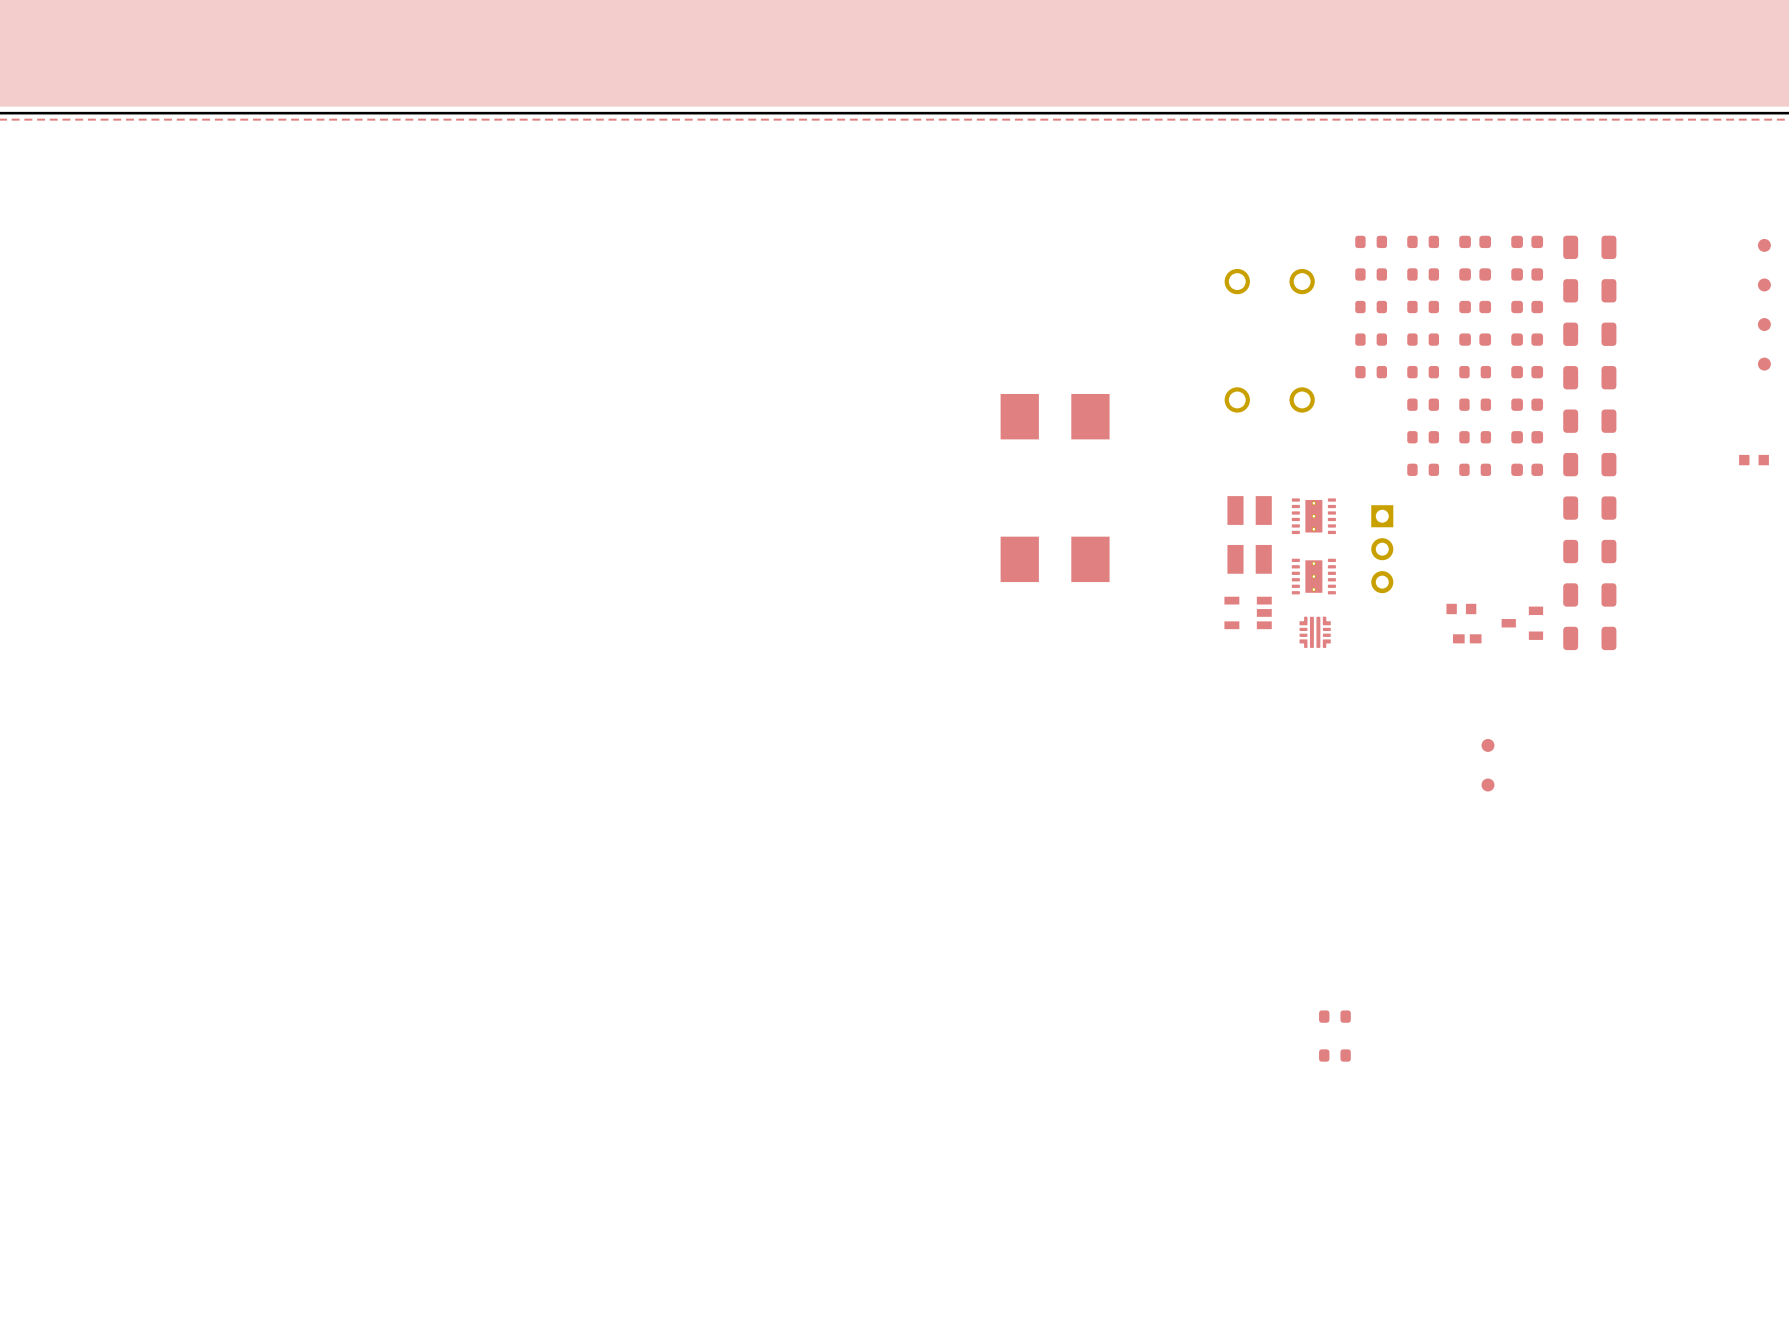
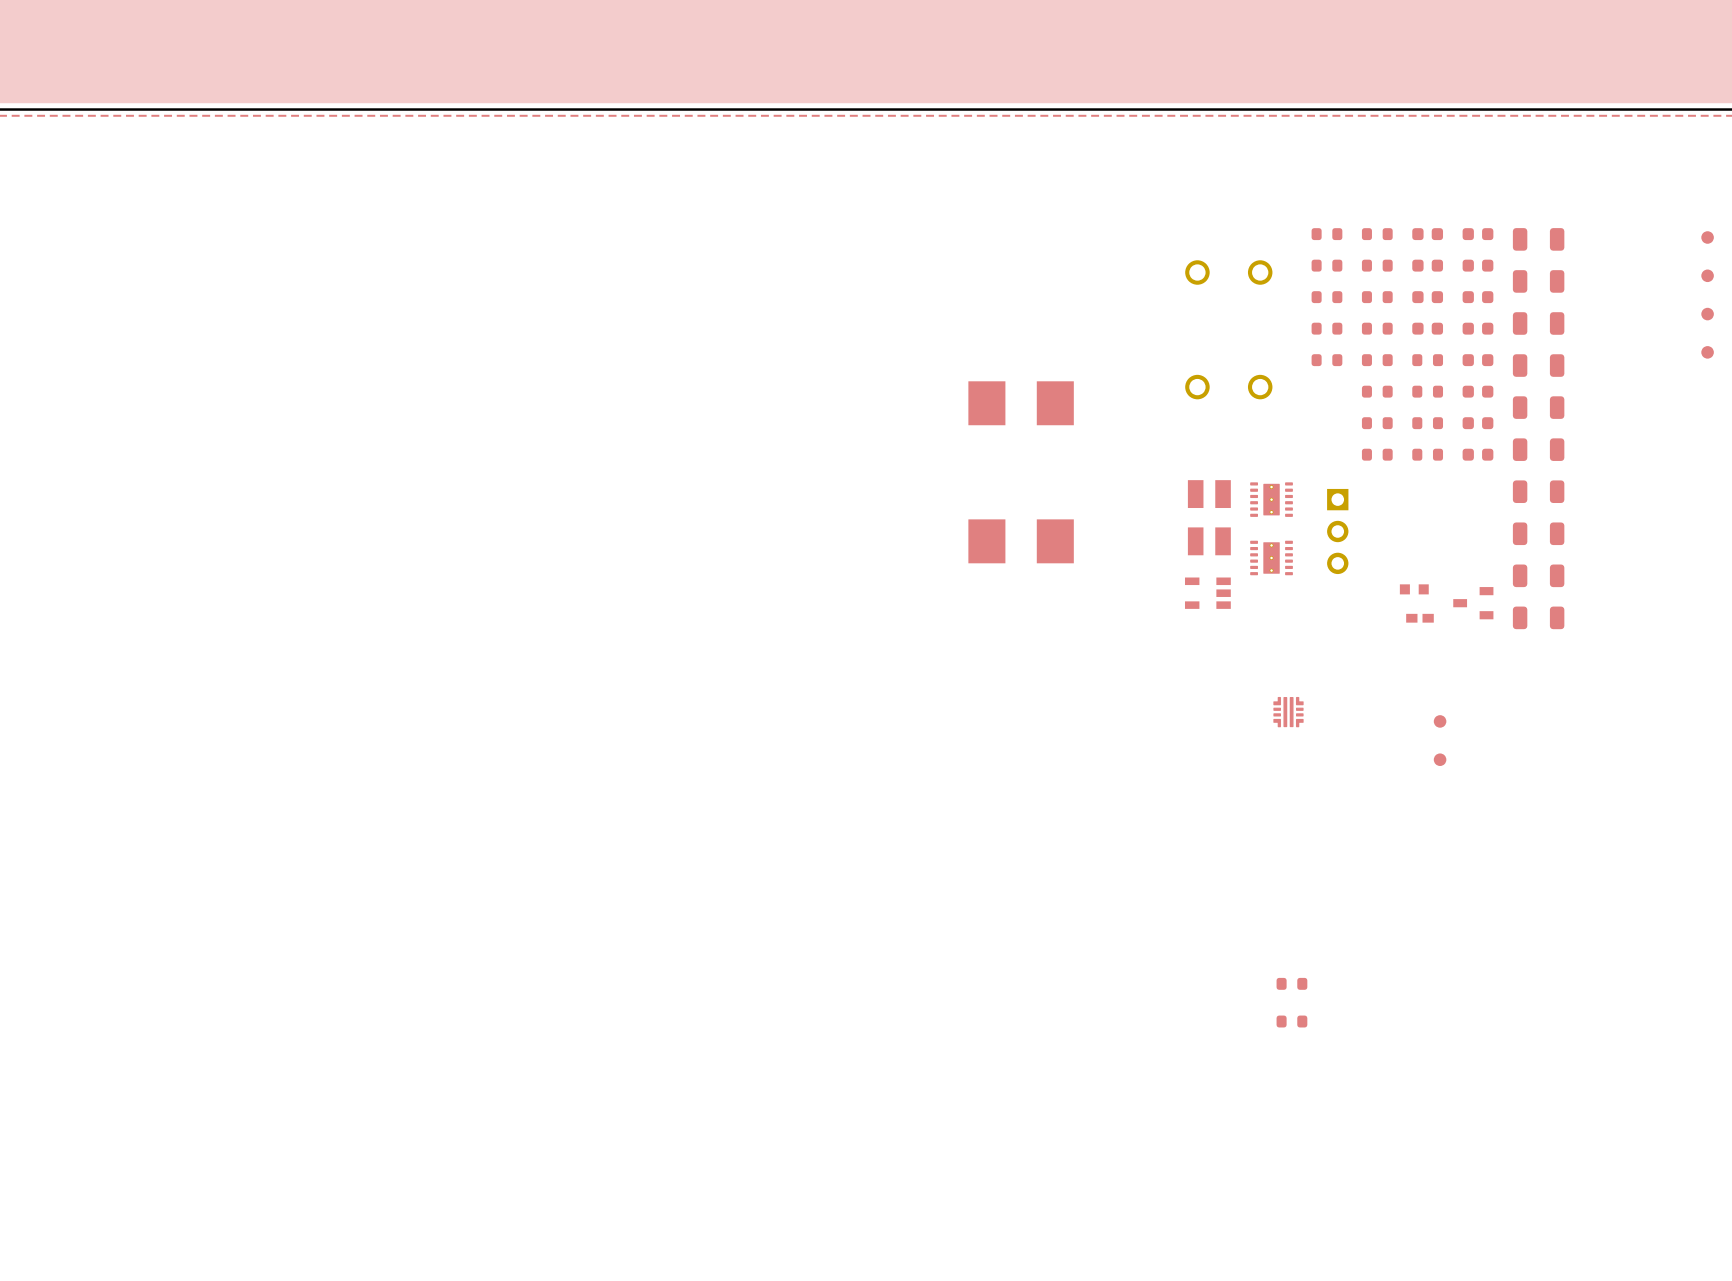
part: (1754, 460) -> none
part position: (1315, 632) -> (1288, 712)

